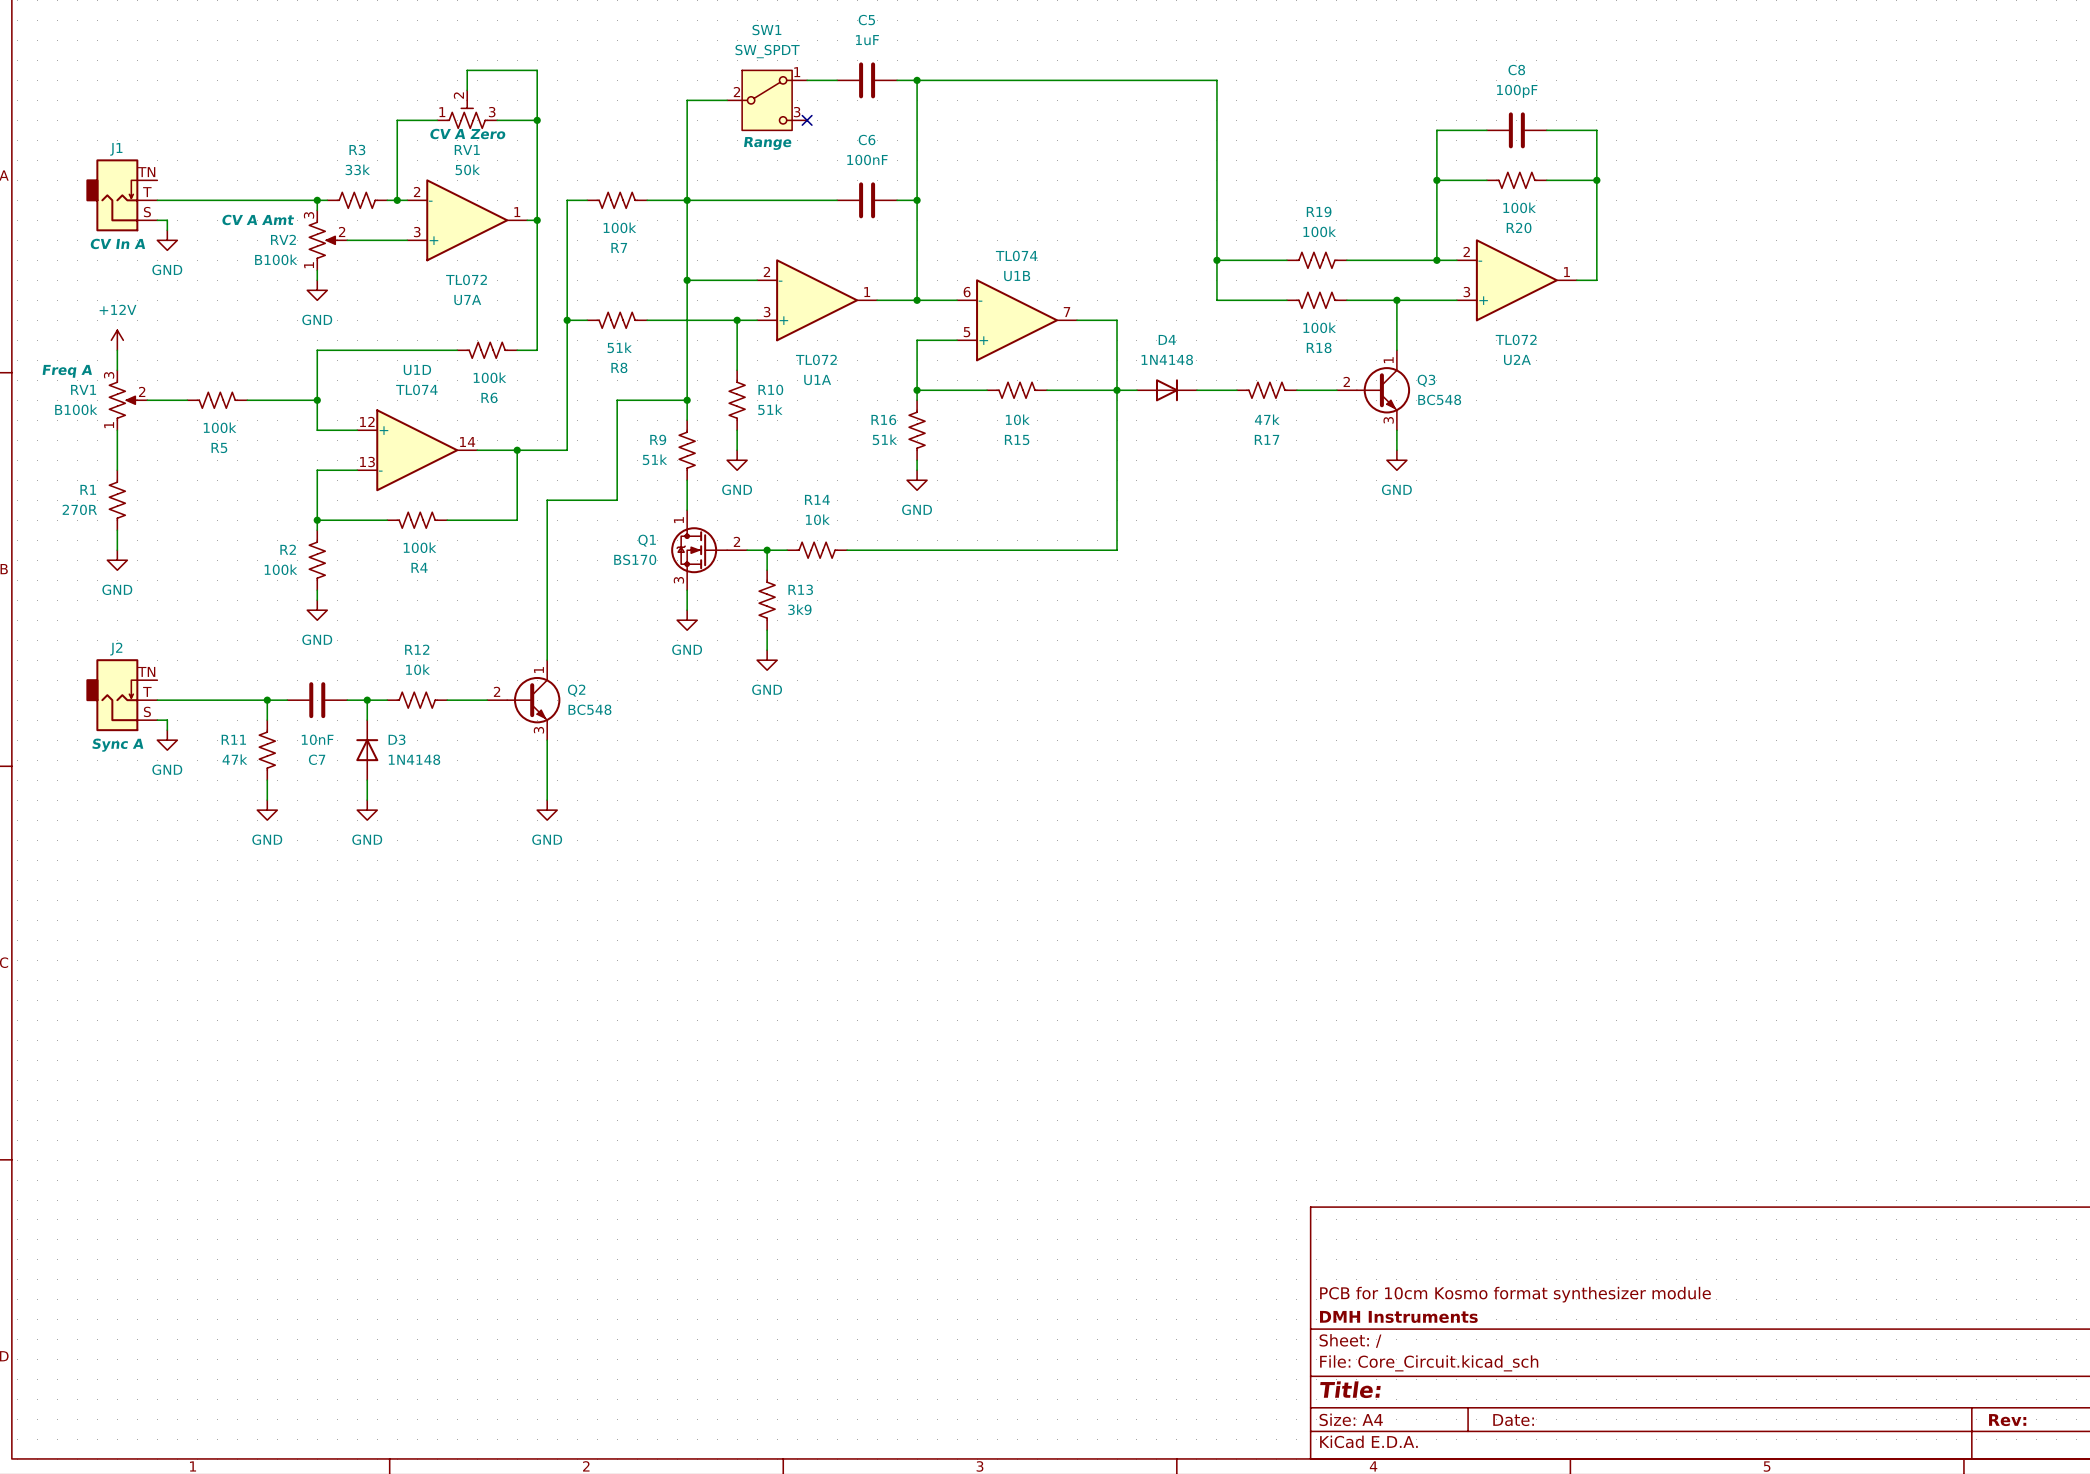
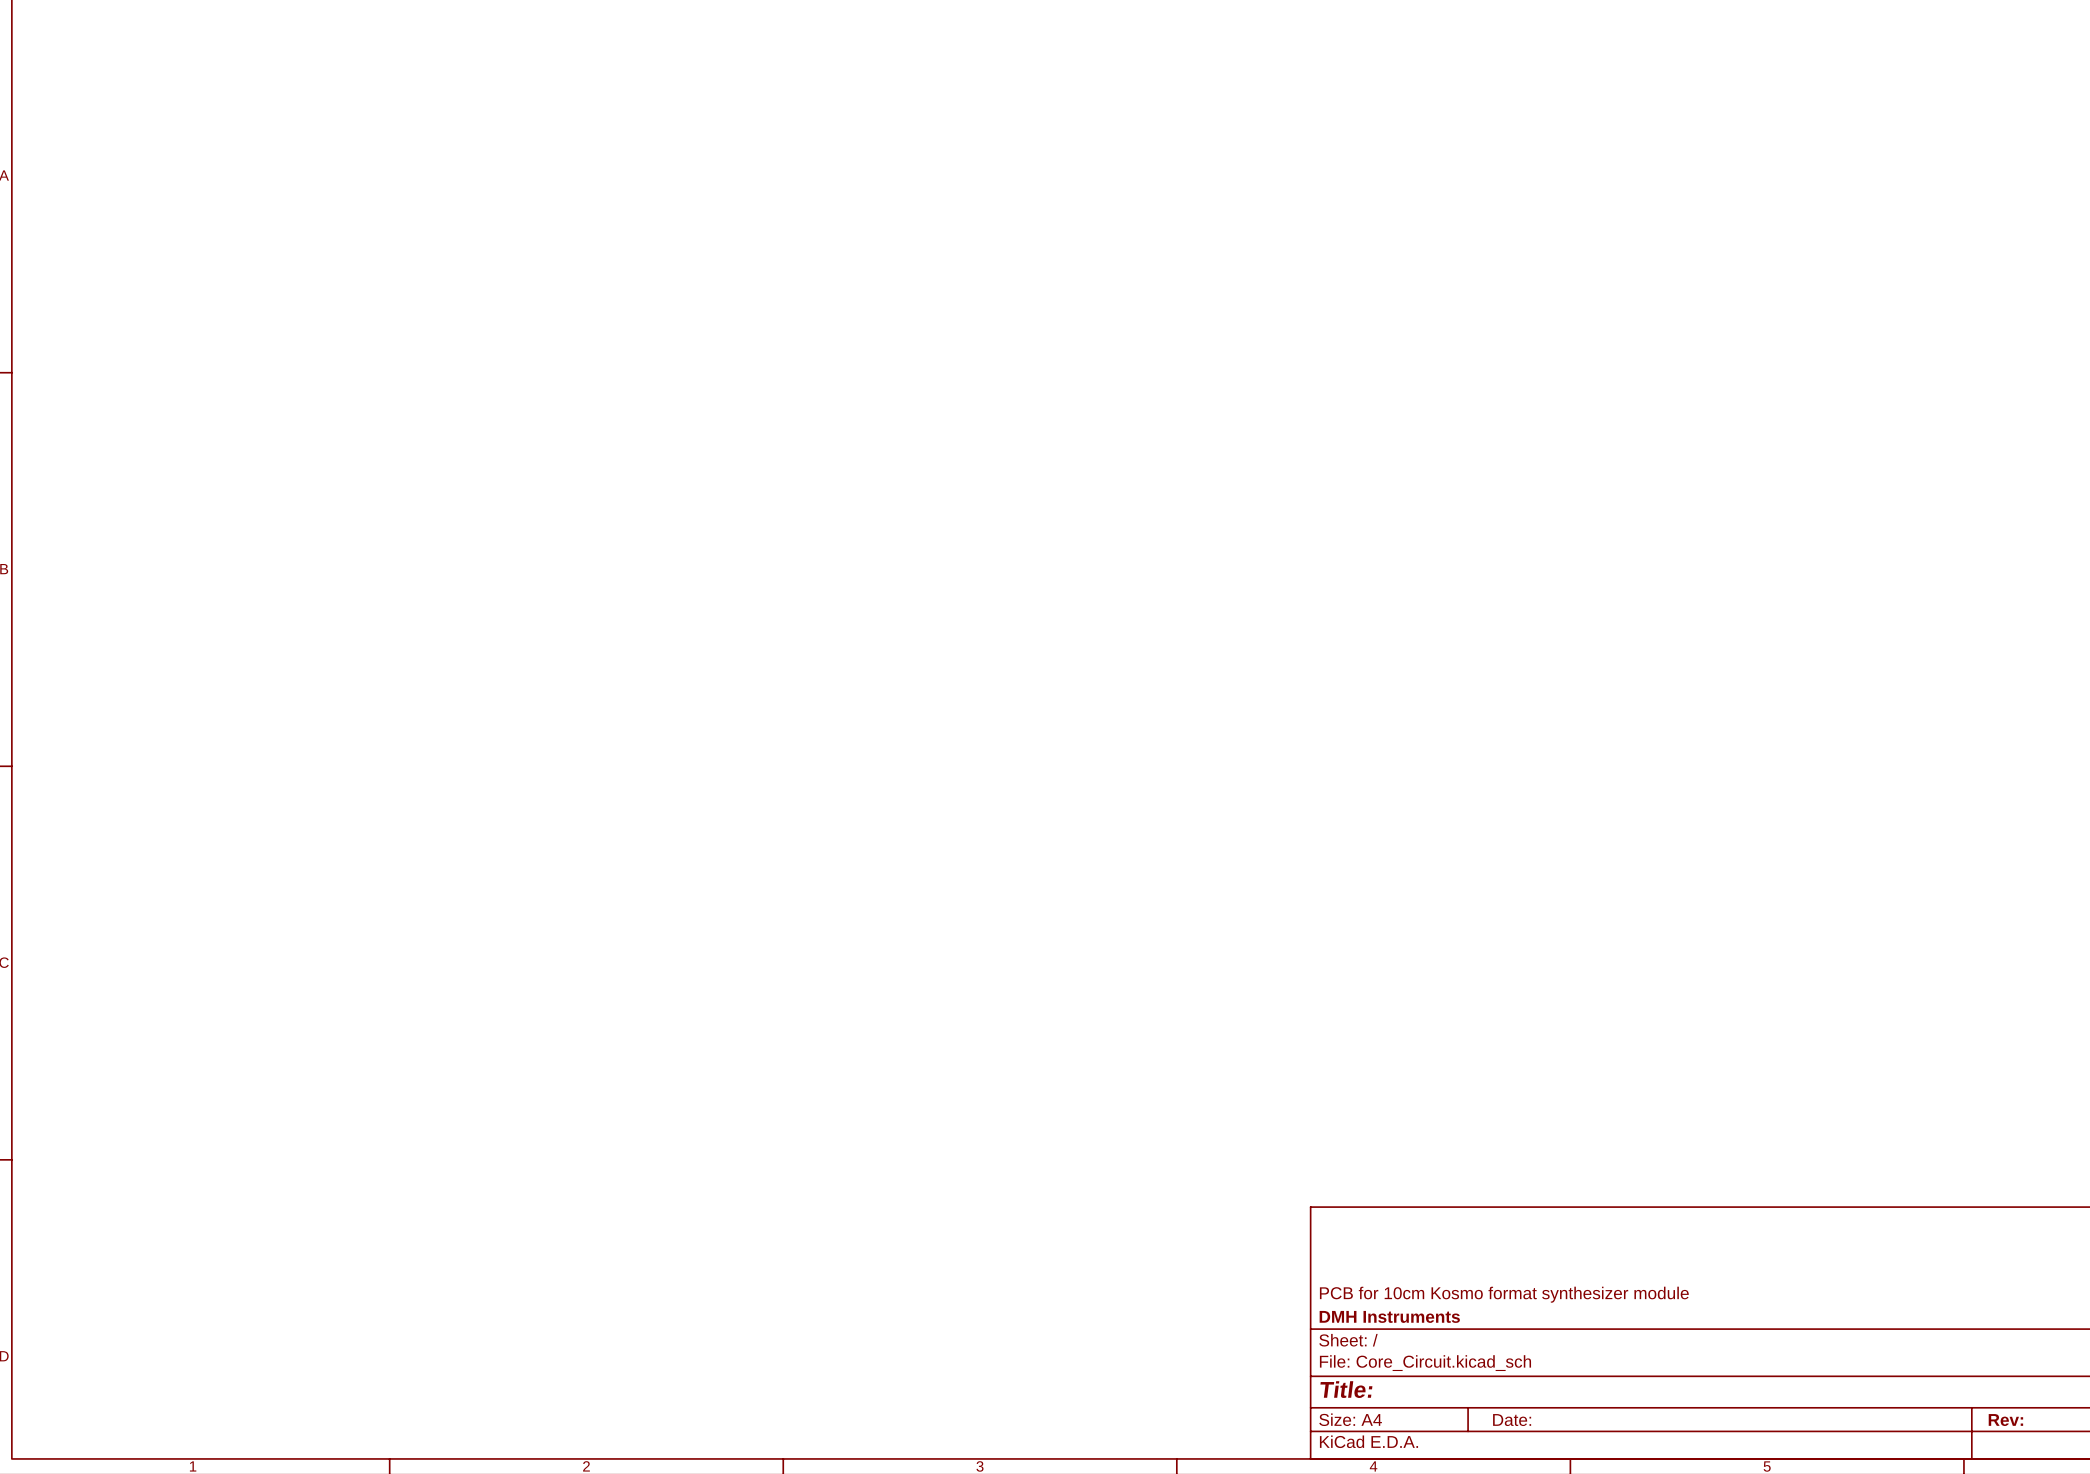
wire: (807, 80) (837, 80) -> none
C5: 1uF (867, 80) -> none
wire: (897, 80) (1216, 80) (1216, 300) (1286, 300) -> none
wire: (917, 80) (917, 300) -> none
junction: (917, 80) -> none
wire: (467, 90) (467, 70) (537, 70) (537, 350) (517, 350) -> none
wire: (727, 100) (687, 100) (687, 420) -> none
SW1: SW_SPDT (767, 100) -> none
RV1: 50k (467, 109) -> none
wire: (437, 120) (397, 120) (397, 200) -> none
wire: (497, 120) (537, 120) -> none
junction: (537, 120) -> none
no-connect mark: (807, 120) -> none
wire: (1486, 130) (1436, 130) (1436, 260) -> none
C8: 100pF (1516, 130) -> none
wire: (1546, 130) (1596, 130) (1596, 280) (1576, 280) -> none
wire: (1436, 180) (1486, 180) -> none
junction: (1436, 180) -> none
R20: 100k (1516, 180) -> none
wire: (1546, 180) (1596, 180) -> none
junction: (1596, 180) -> none
J1: (121, 195) -> none
wire: (157, 200) (327, 200) -> none
wire: (317, 200) (317, 210) -> none
junction: (317, 200) -> none
R3: 33k (357, 200) -> none
wire: (387, 200) (407, 200) -> none
junction: (397, 200) -> none
wire: (587, 200) (567, 200) (567, 450) (477, 450) -> none
R7: 100k (617, 200) -> none
wire: (647, 200) (837, 200) -> none
junction: (687, 200) -> none
C6: 100nF (867, 200) -> none
wire: (897, 200) (917, 200) -> none
junction: (917, 200) -> none
wire: (157, 220) (167, 220) (167, 230) -> none
U7A: TL072 (467, 220) -> none
wire: (527, 220) (537, 220) -> none
junction: (537, 220) -> none
power symbol: GND (167, 240) -> none
RV2: B100k (328, 240) -> none
wire: (347, 240) (407, 240) -> none
wire: (1216, 260) (1286, 260) -> none
junction: (1216, 260) -> none
R19: 100k (1316, 260) -> none
wire: (1346, 260) (1456, 260) -> none
junction: (1436, 260) -> none
wire: (317, 270) (317, 280) -> none
wire: (687, 280) (757, 280) -> none
junction: (687, 280) -> none
U2A: TL072 (1516, 280) -> none
power symbol: GND (317, 290) -> none
U1A: TL072 (817, 300) -> none
wire: (877, 300) (957, 300) -> none
junction: (917, 300) -> none
R18: 100k (1316, 300) -> none
wire: (1346, 300) (1456, 300) -> none
wire: (1396, 300) (1396, 350) -> none
junction: (1396, 300) -> none
wire: (567, 320) (587, 320) -> none
junction: (567, 320) -> none
R8: 51k (617, 320) -> none
wire: (647, 320) (757, 320) -> none
wire: (737, 320) (737, 370) -> none
junction: (737, 320) -> none
U1B: TL074 (1017, 320) -> none
wire: (1077, 320) (1117, 320) (1117, 550) (847, 550) -> none
power symbol: +12V (117, 340) -> none
wire: (957, 340) (917, 340) (917, 400) -> none
wire: (117, 350) (117, 370) -> none
wire: (457, 350) (317, 350) (317, 430) (357, 430) -> none
R6: 100k (487, 350) -> none
wire: (917, 390) (987, 390) -> none
junction: (917, 390) -> none
R15: 10k (1017, 390) -> none
wire: (1047, 390) (1136, 390) -> none
junction: (1117, 390) -> none
D4: 1N4148 (1166, 390) -> none
wire: (1196, 390) (1236, 390) -> none
R17: 47k (1266, 390) -> none
wire: (1296, 390) (1336, 390) -> none
Q3: BC548 (1373, 390) -> none
RV1: B100k (128, 400) -> none
wire: (147, 400) (187, 400) -> none
R5: 100k (217, 400) -> none
wire: (247, 400) (317, 400) -> none
junction: (317, 400) -> none
wire: (687, 400) (617, 400) (617, 500) (547, 500) (547, 660) -> none
junction: (687, 400) -> none
R10: 51k (737, 400) -> none
wire: (117, 430) (117, 470) -> none
wire: (737, 430) (737, 450) -> none
R16: 51k (917, 430) -> none
wire: (1396, 430) (1396, 450) -> none
U1D: TL074 (417, 450) -> none
wire: (517, 450) (517, 520) (447, 520) -> none
junction: (517, 450) -> none
R9: 51k (687, 450) -> none
power symbol: GND (737, 460) -> none
wire: (917, 460) (917, 470) -> none
power symbol: GND (1396, 460) -> none
wire: (357, 470) (317, 470) (317, 530) -> none
wire: (687, 480) (687, 510) -> none
power symbol: GND (917, 480) -> none
R1: 270R (117, 500) -> none
wire: (317, 520) (387, 520) -> none
junction: (317, 520) -> none
R4: 100k (417, 520) -> none
wire: (117, 530) (117, 550) -> none
Q1: BS170 (709, 550) -> none
wire: (747, 550) (787, 550) -> none
wire: (767, 550) (767, 570) -> none
junction: (767, 550) -> none
R14: 10k (817, 550) -> none
power symbol: GND (117, 560) -> none
R2: 100k (317, 560) -> none
wire: (317, 590) (317, 600) -> none
wire: (687, 590) (687, 610) -> none
R13: 3k9 (767, 600) -> none
power symbol: GND (317, 610) -> none
power symbol: GND (687, 620) -> none
wire: (767, 630) (767, 650) -> none
power symbol: GND (767, 660) -> none
J2: (121, 695) -> none
wire: (157, 700) (287, 700) -> none
wire: (267, 700) (267, 720) -> none
junction: (267, 700) -> none
C7: 10nF (317, 700) -> none
wire: (347, 700) (387, 700) -> none
wire: (367, 700) (367, 720) -> none
junction: (367, 700) -> none
R12: 10k (417, 700) -> none
wire: (447, 700) (487, 700) -> none
Q2: BC548 (523, 700) -> none
wire: (157, 720) (167, 720) (167, 730) -> none
power symbol: GND (167, 740) -> none
wire: (547, 740) (547, 800) -> none
R11: 47k (267, 750) -> none
D3: 1N4148 (367, 750) -> none
wire: (267, 780) (267, 800) -> none
wire: (367, 780) (367, 800) -> none
power symbol: GND (267, 810) -> none
power symbol: GND (367, 810) -> none
power symbol: GND (547, 810) -> none

